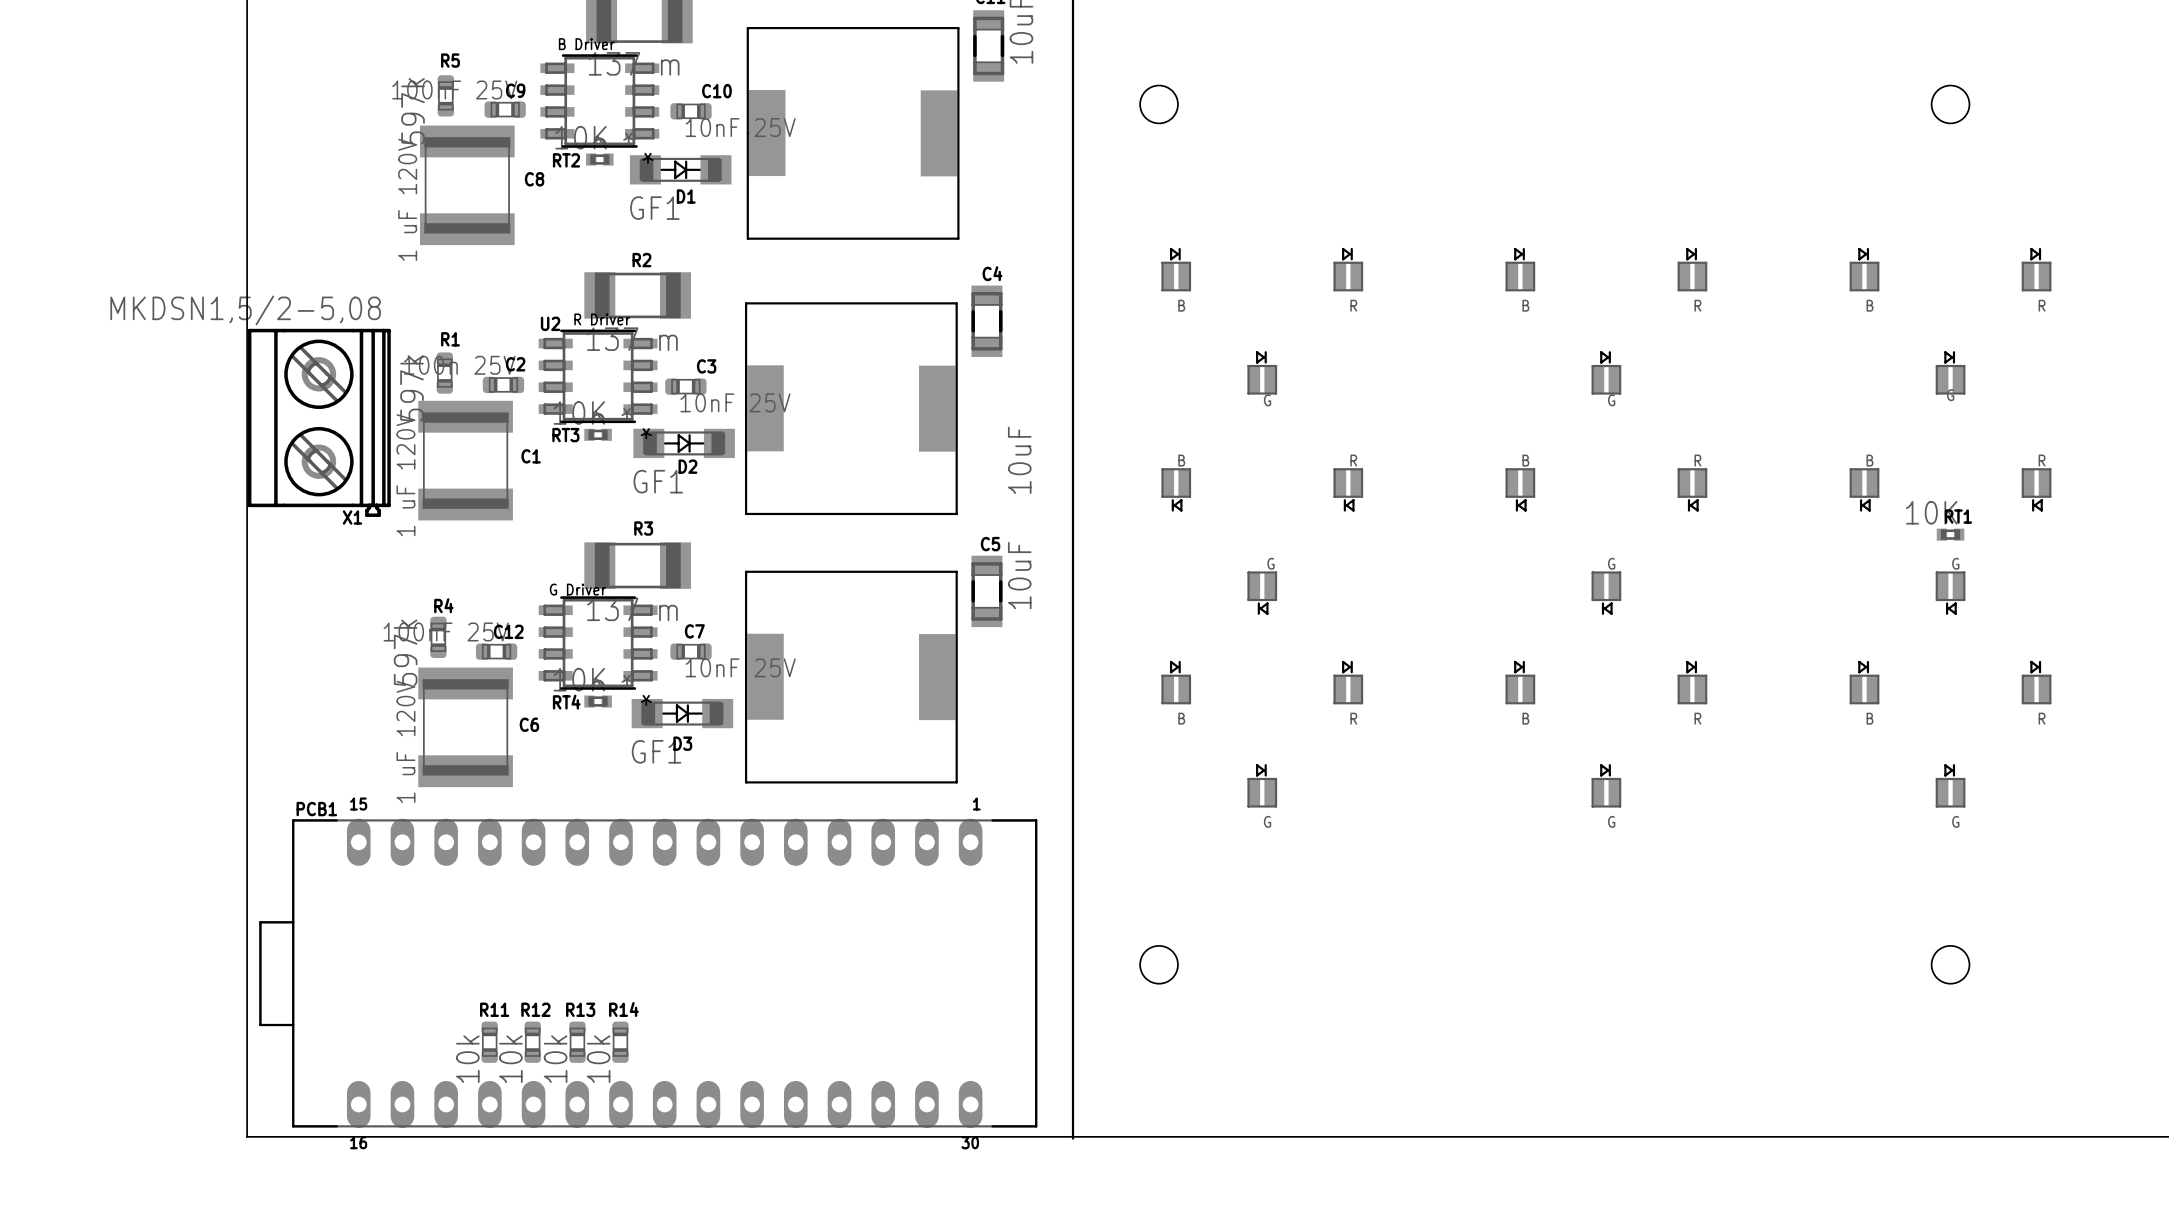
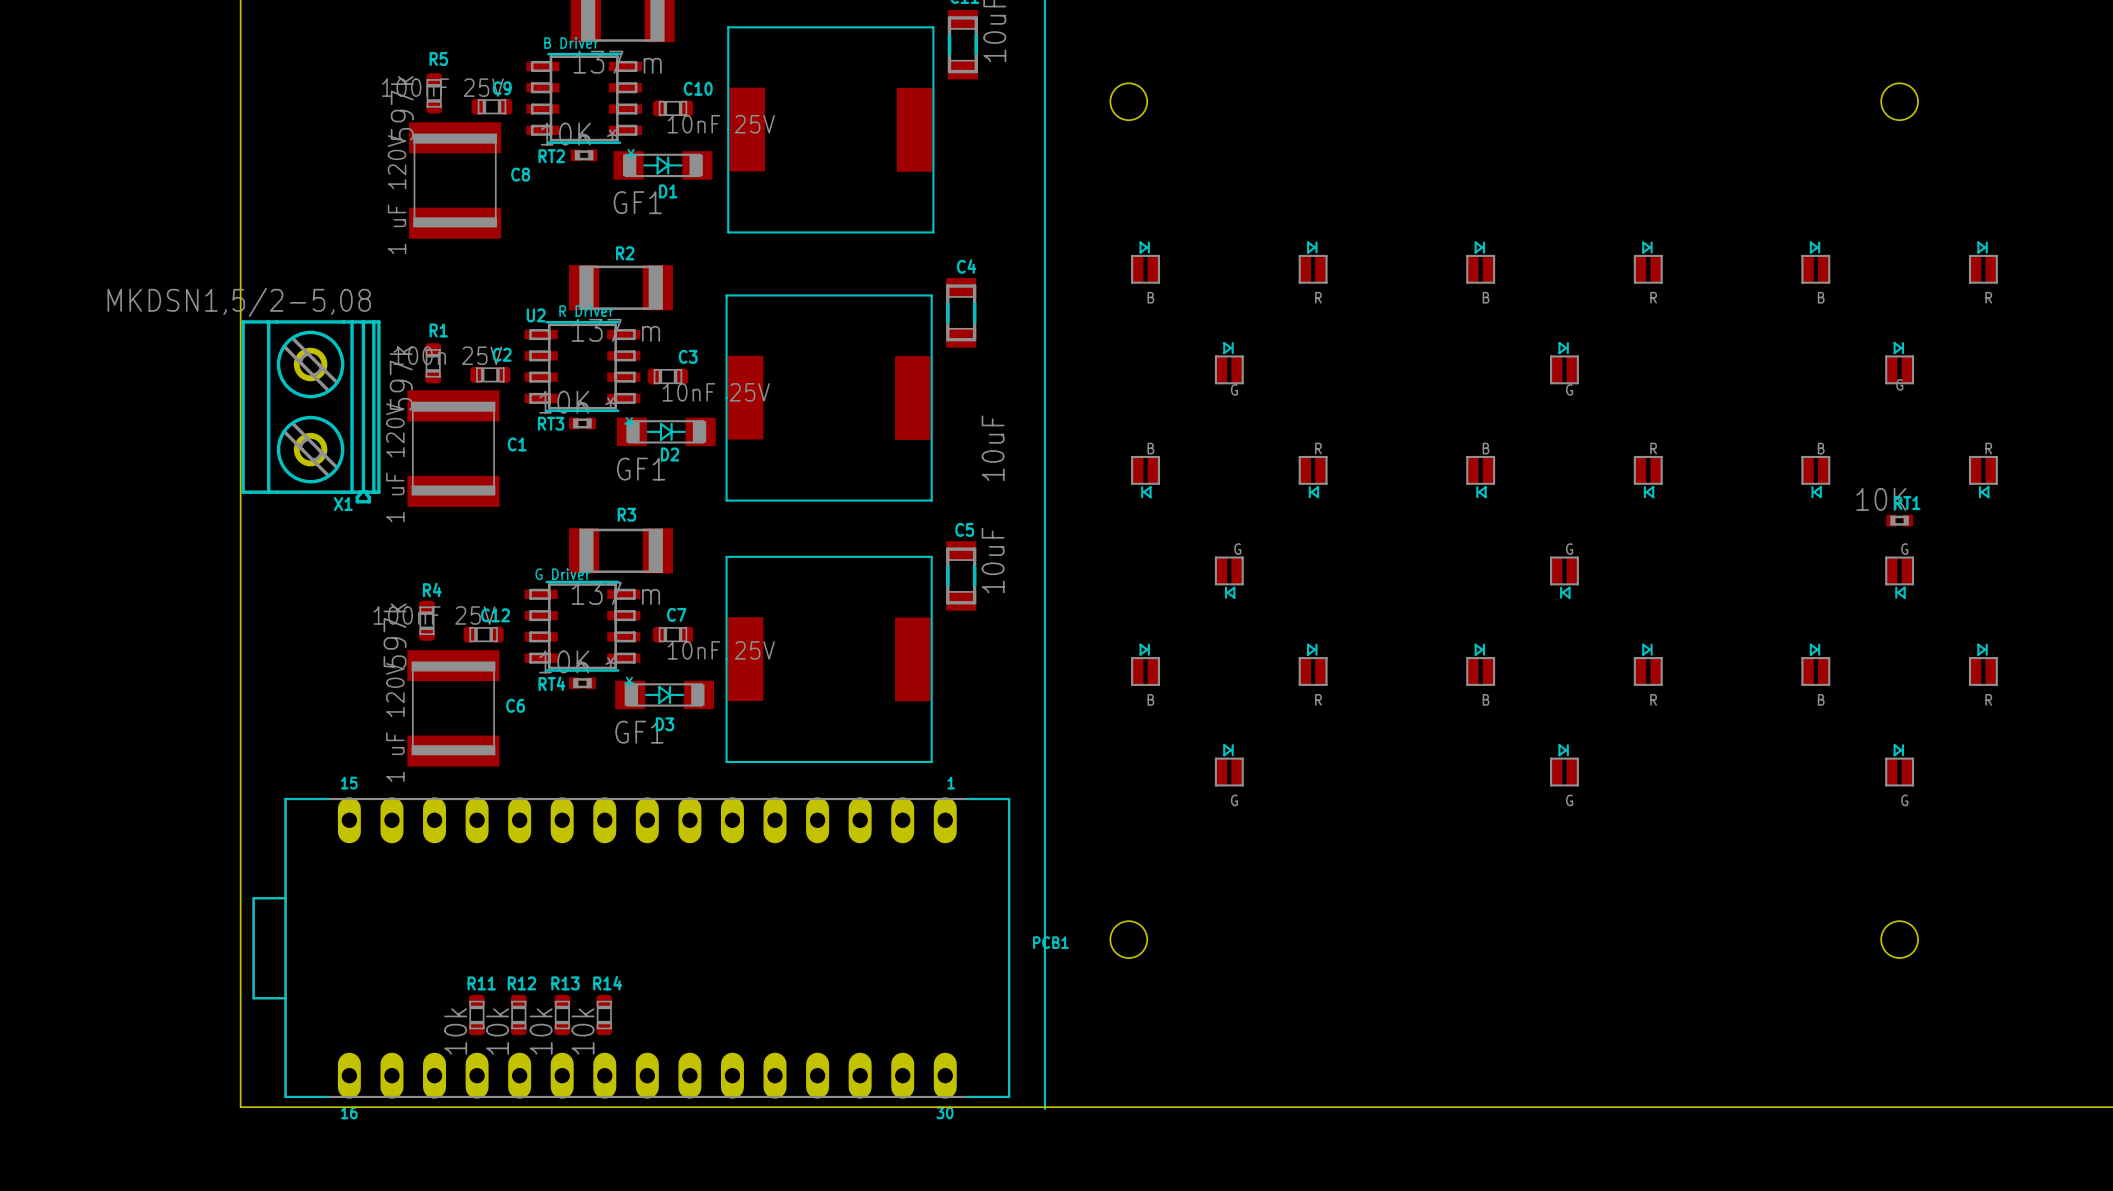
PCB1 name position: PCB1 (316, 809) -> PCB1 (1050, 942)

